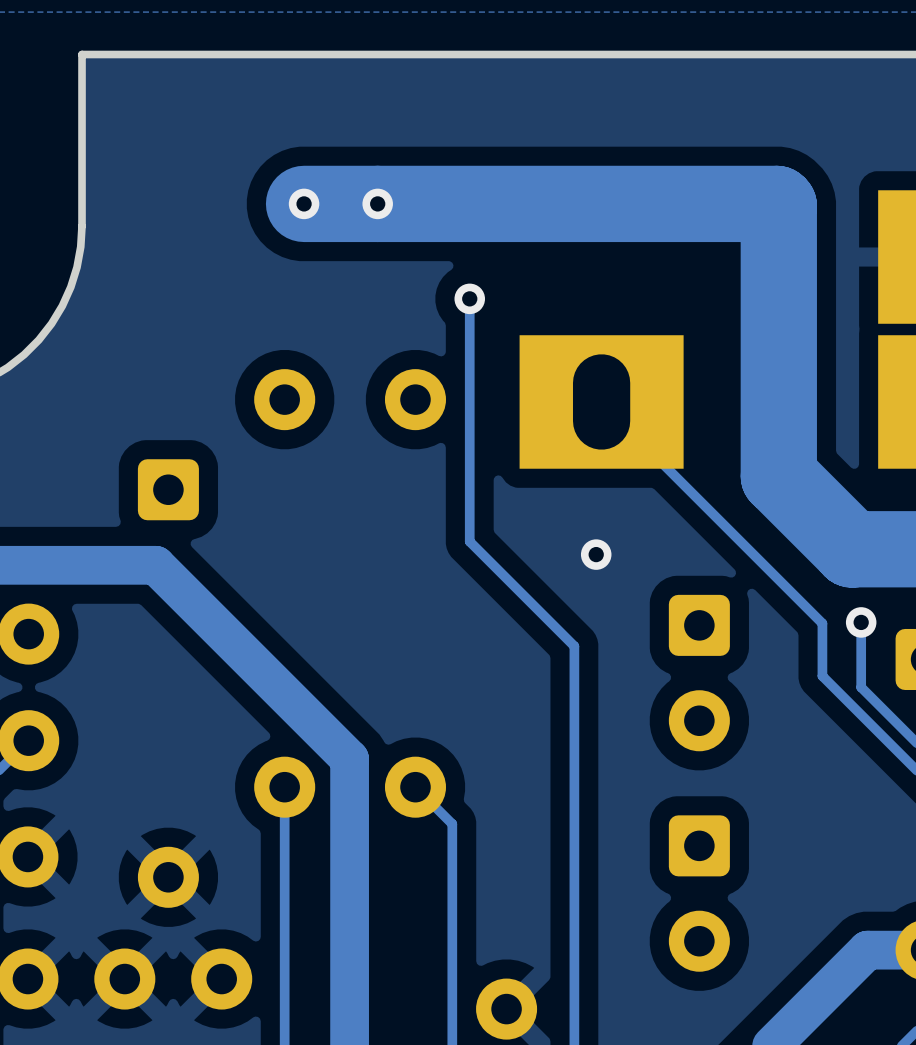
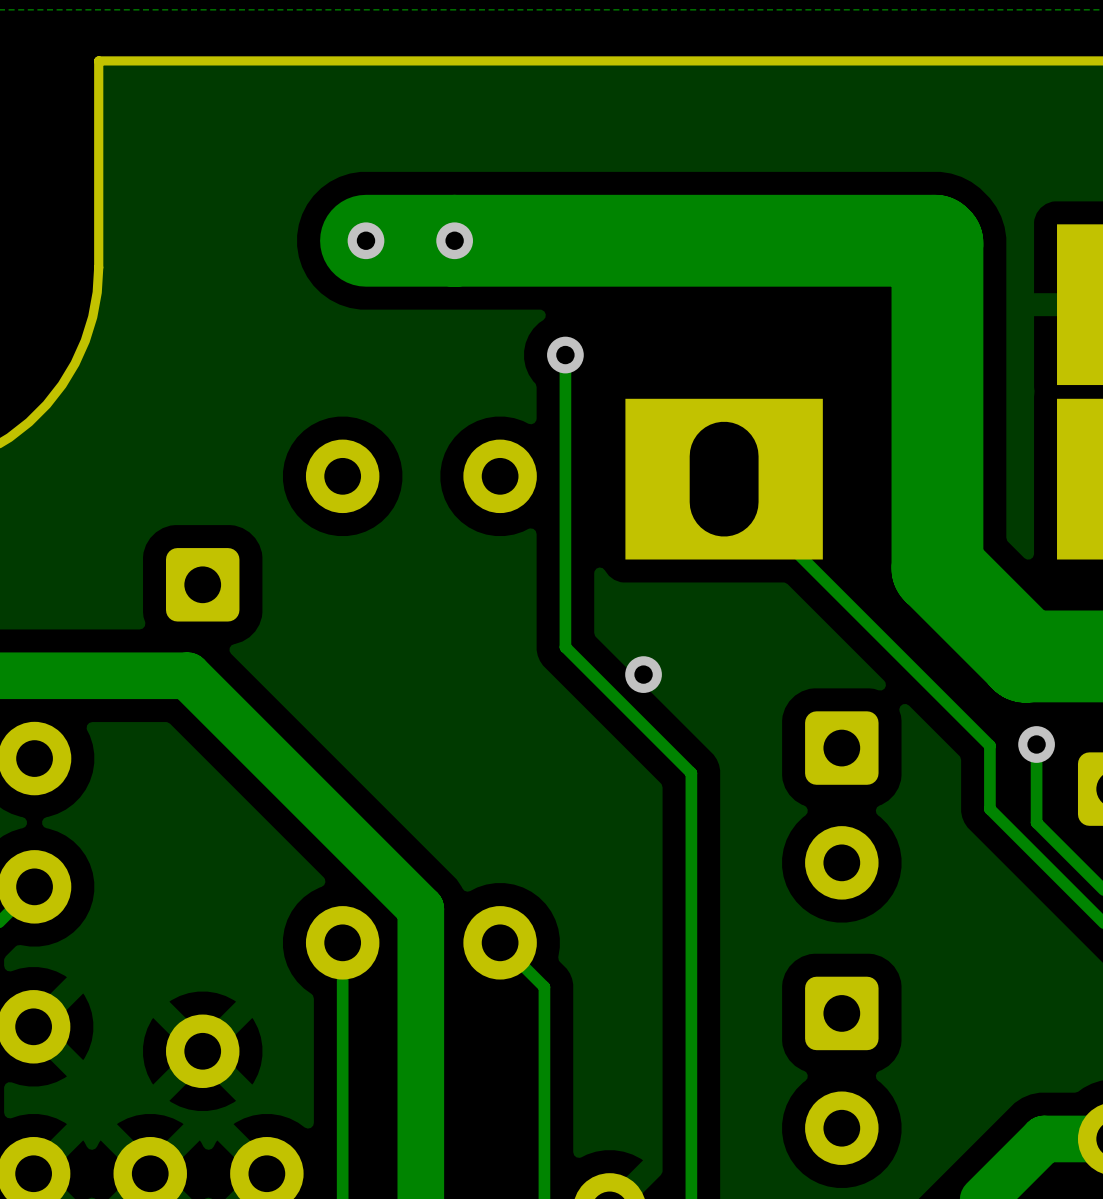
via position: (596, 554) -> (643, 674)

